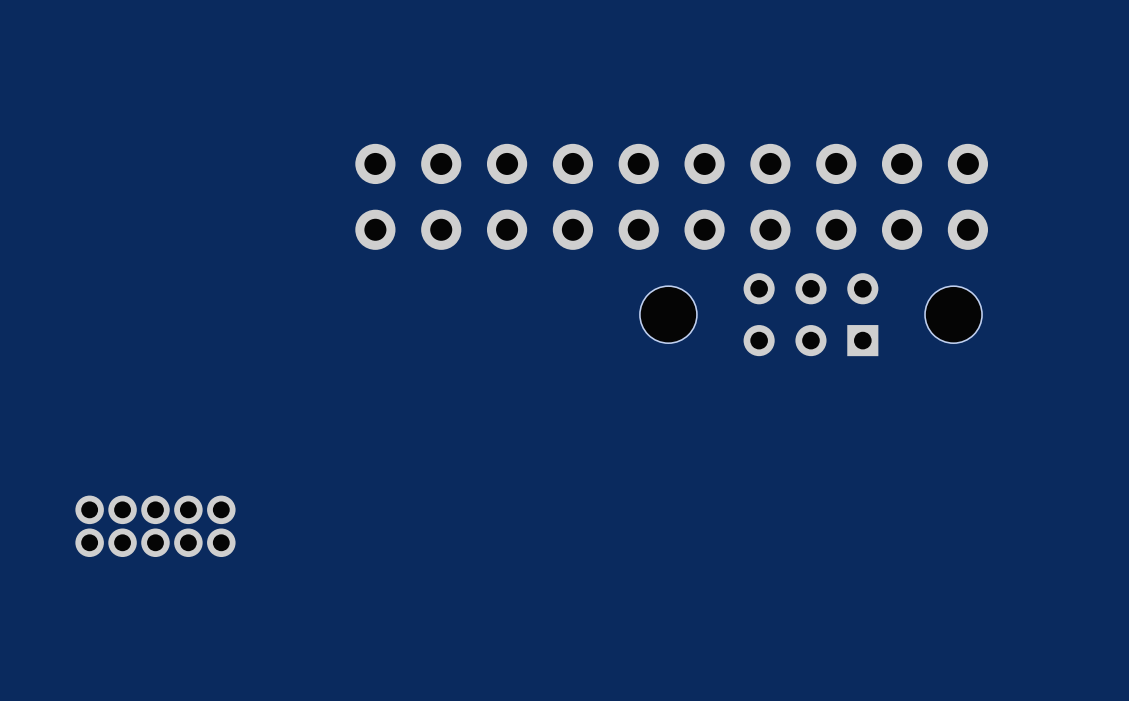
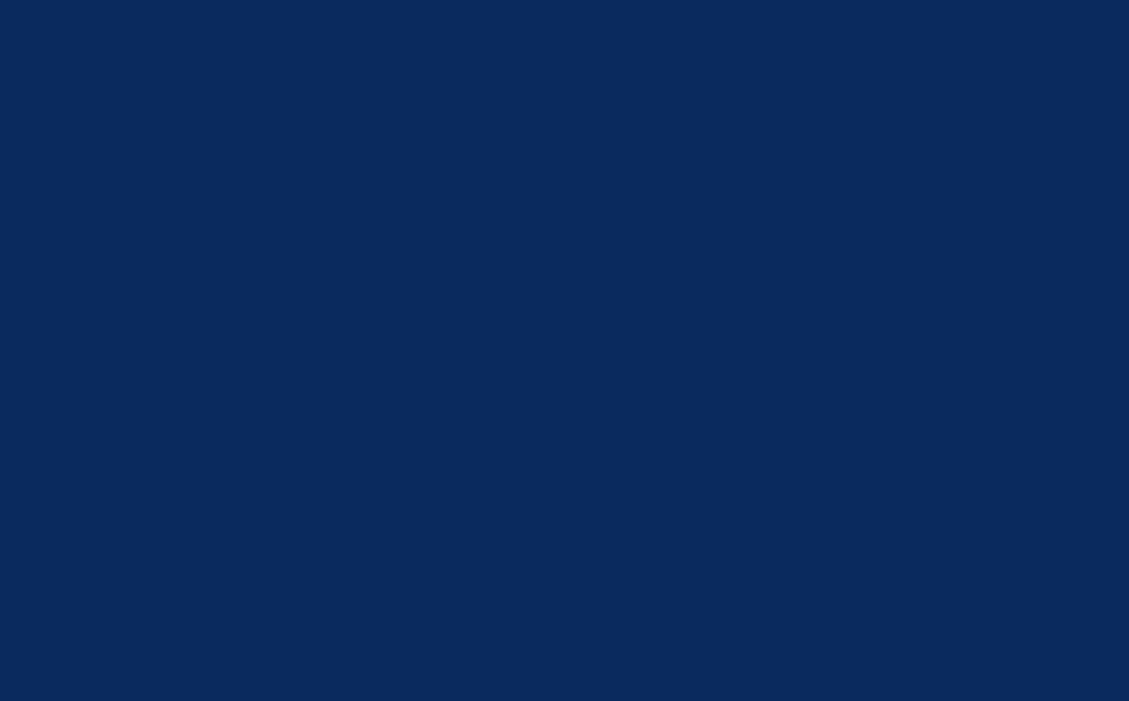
part: (671, 196) -> none
part: (810, 314) -> none
part: (155, 526) -> none

